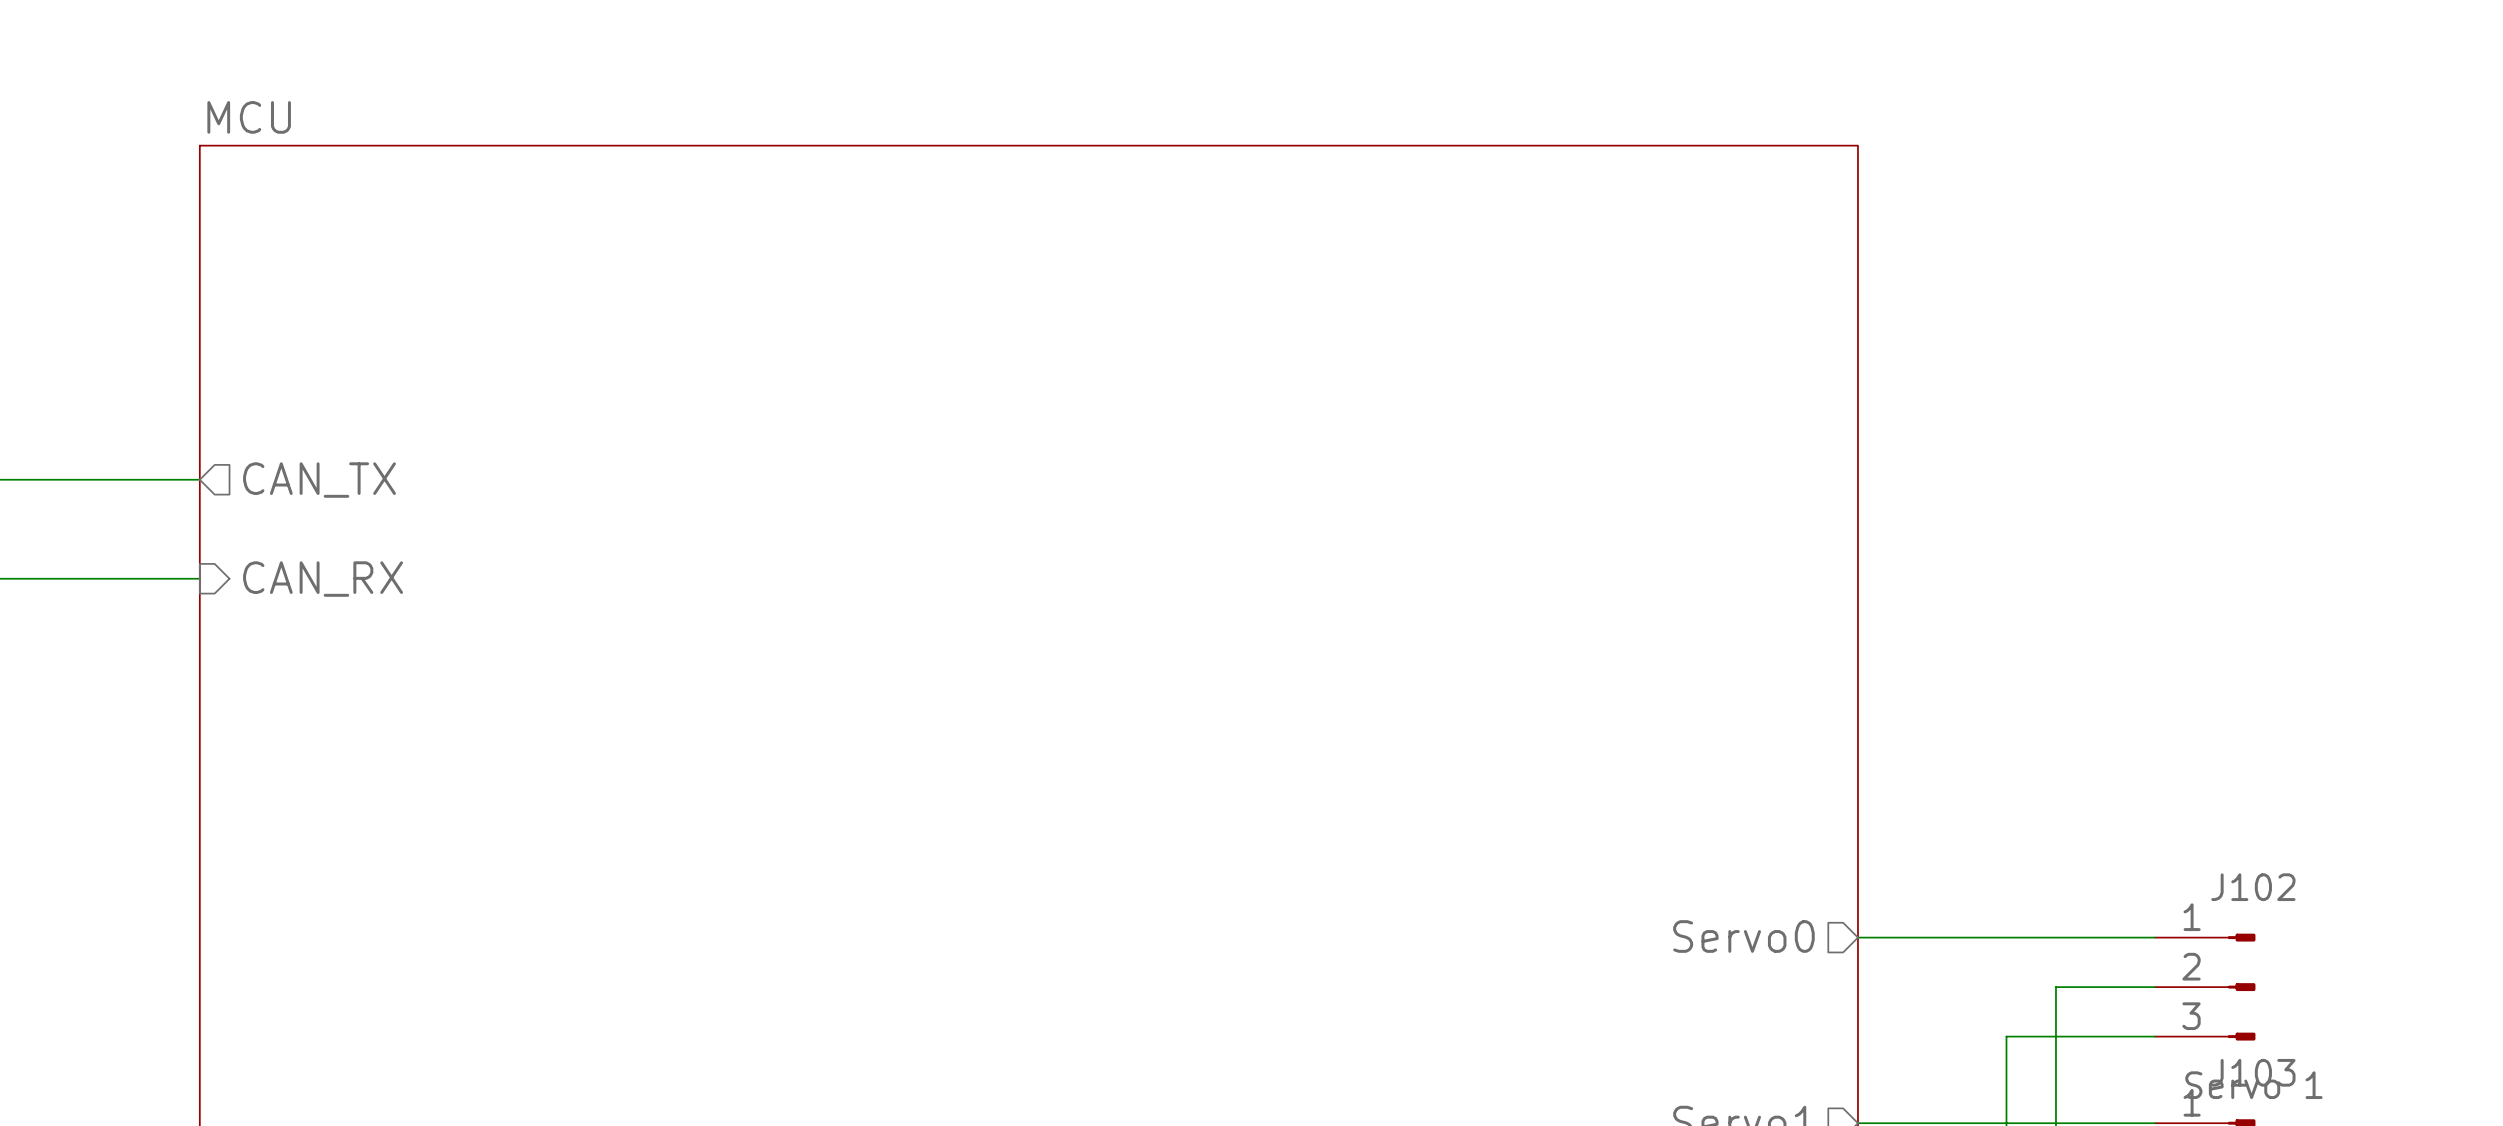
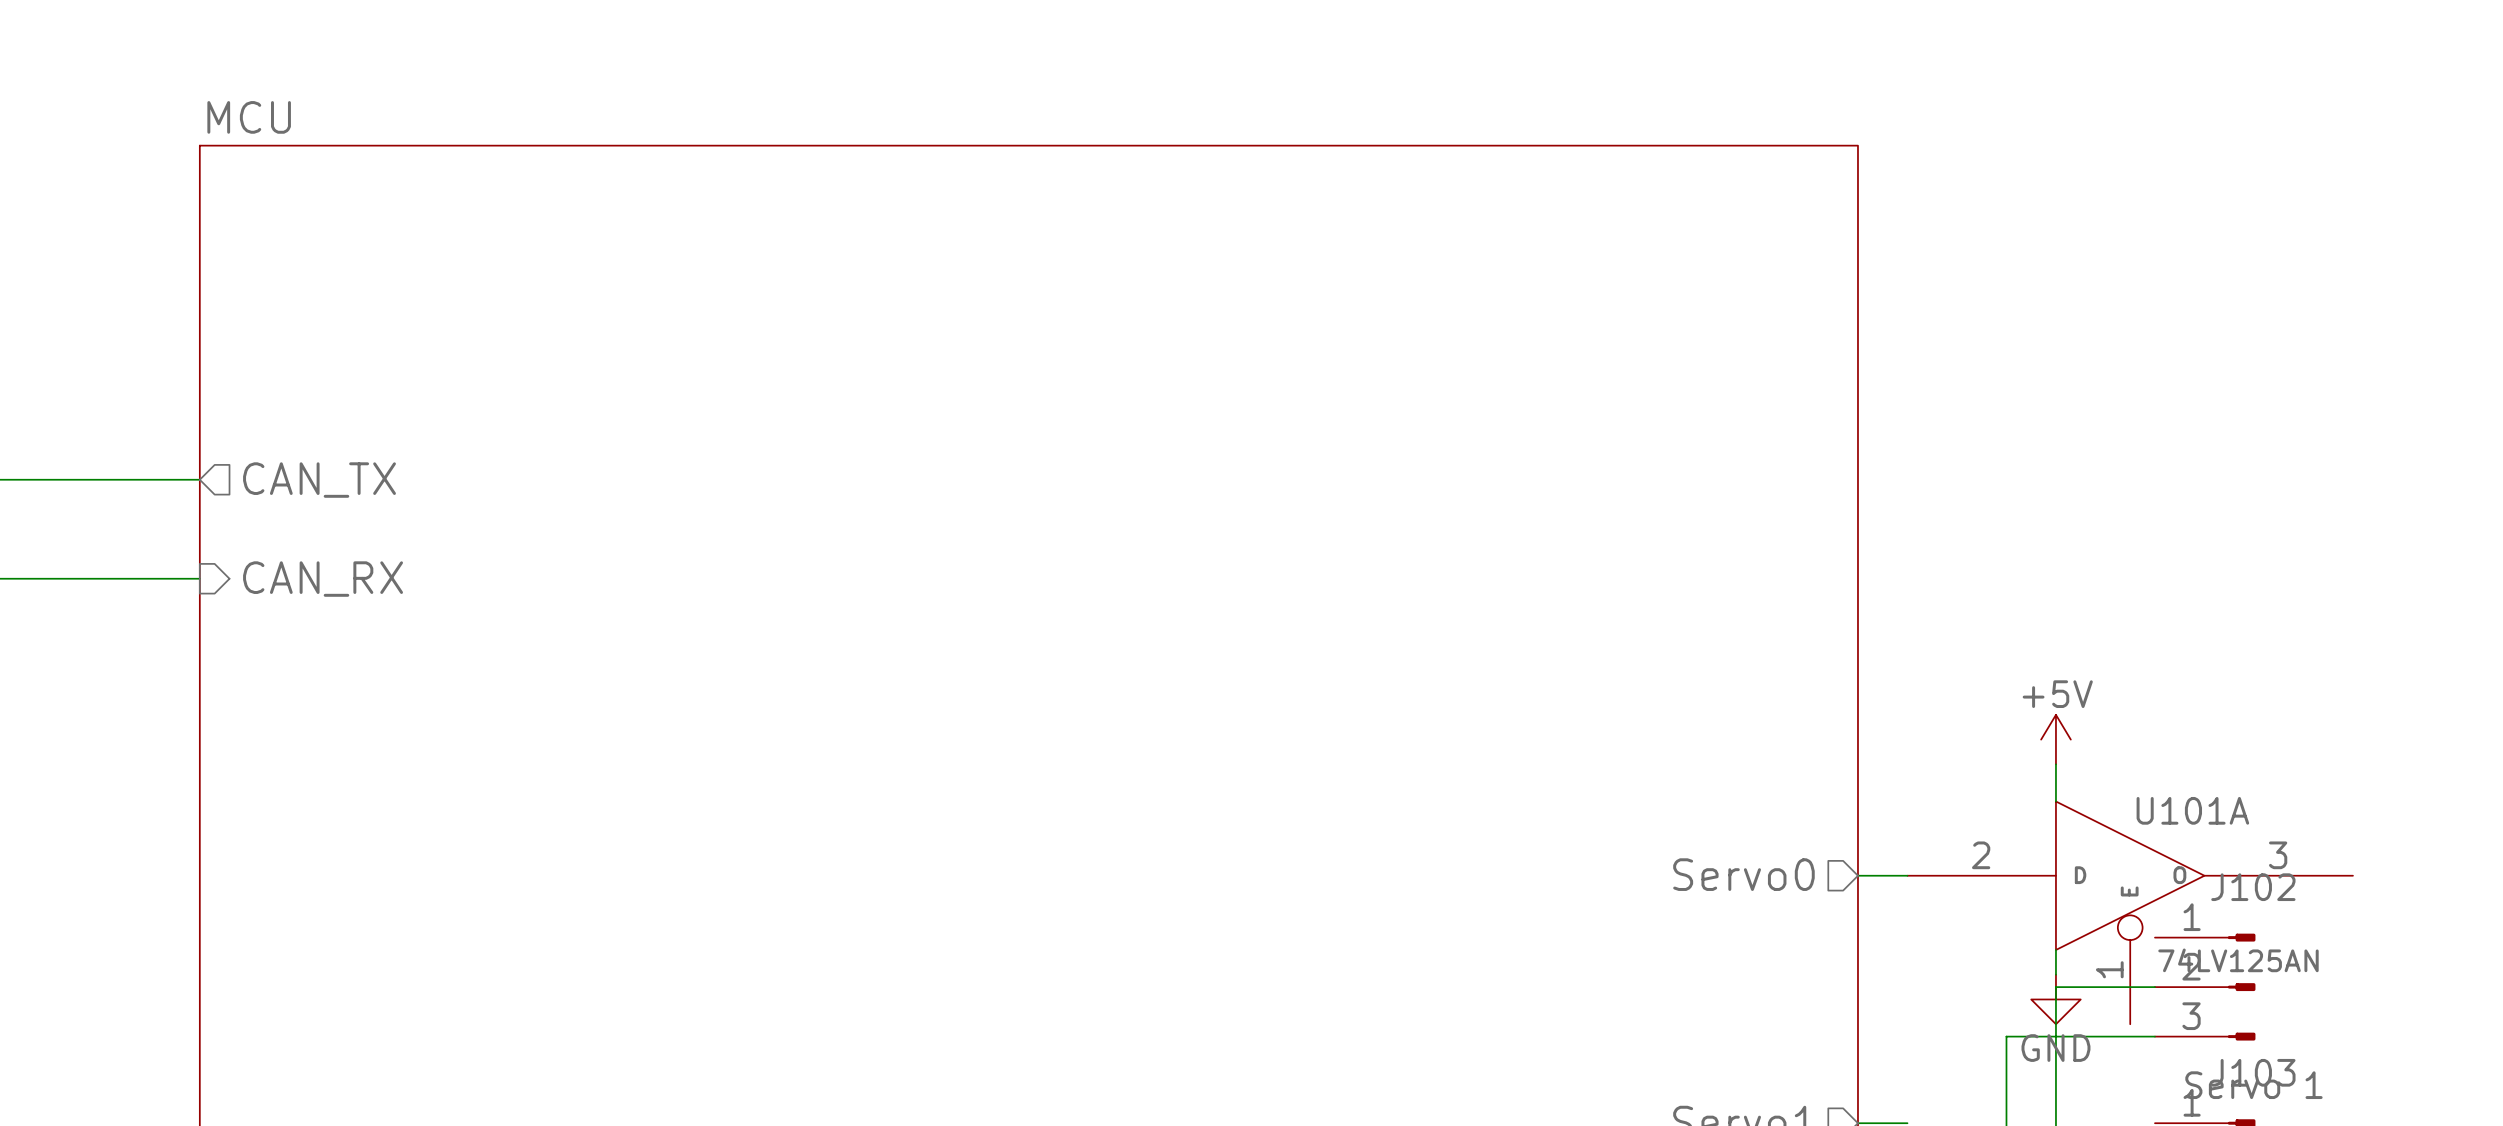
power symbol: none -> +5V (2055, 739)
wire: none -> (2055, 764) (2055, 801)
wire: none -> (1857, 875) (1907, 875)
U101A: none -> 74LV125AN (2130, 912)
sheet pin position: Servo0 (1743, 936) -> Servo0 (1743, 874)
wire: (1857, 937) (2154, 937) -> none
wire: none -> (2055, 949) (2055, 974)
power symbol: none -> GND (2055, 999)
wire: (1907, 1123) (2154, 1123) -> none

